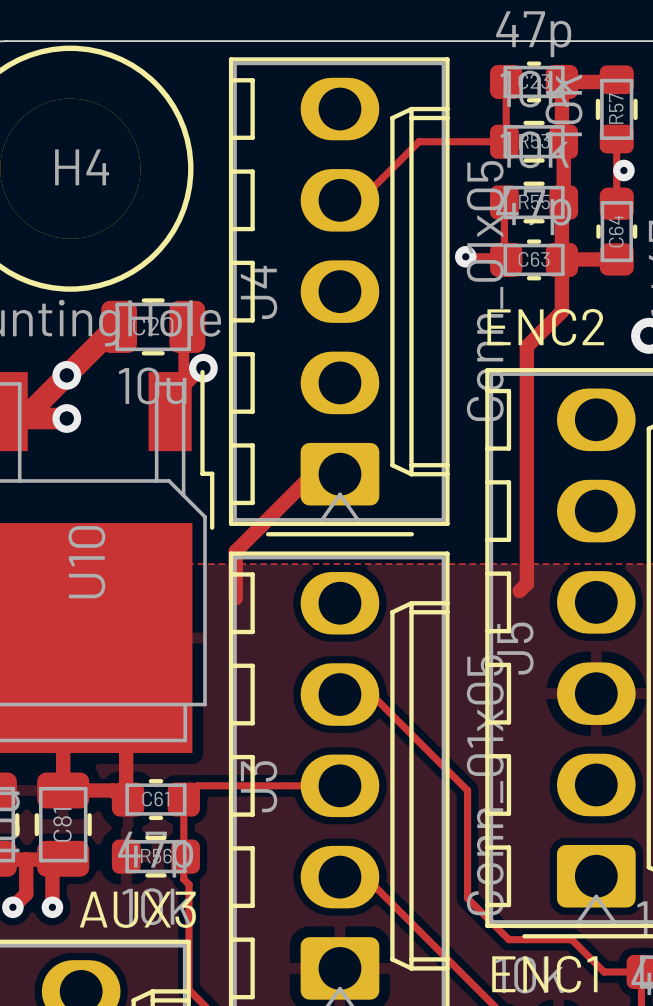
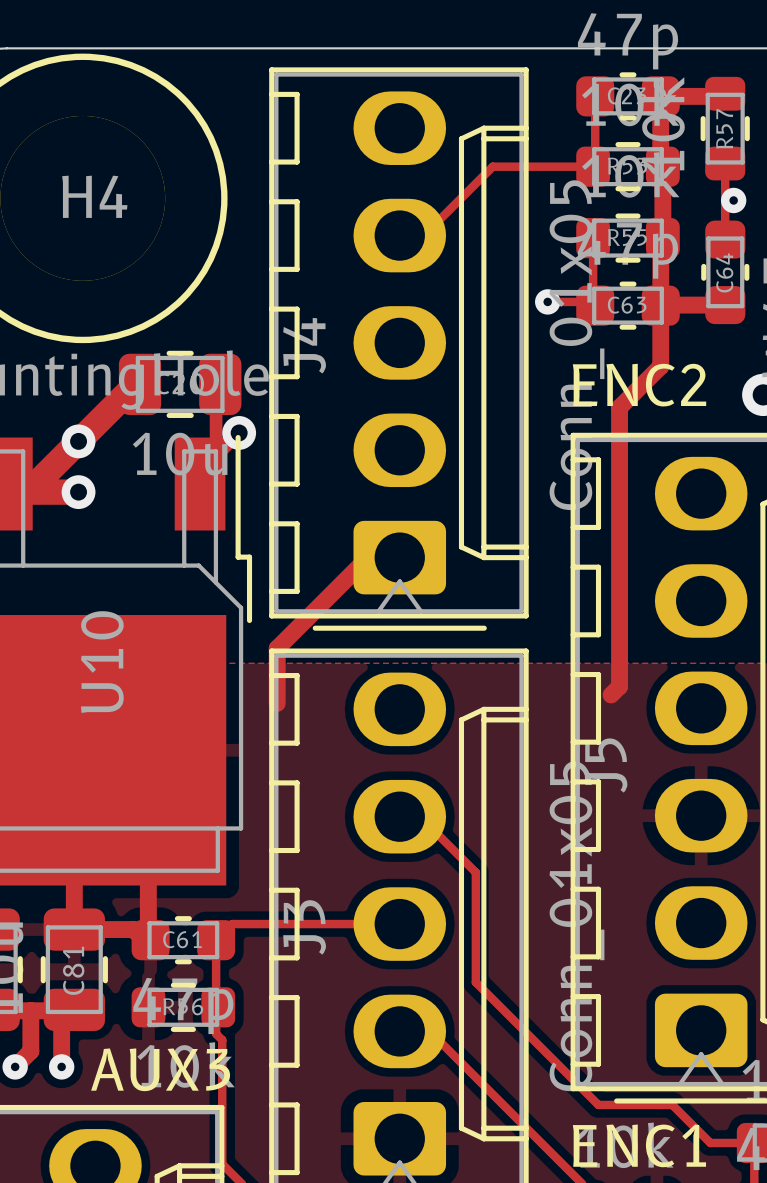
track: (357, 694) (371, 694) (467, 790) (467, 898) -> (420, 816) (475, 872) (475, 982) (549, 1056)

